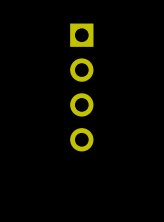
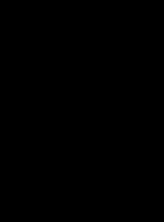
part: (81, 87) -> none

